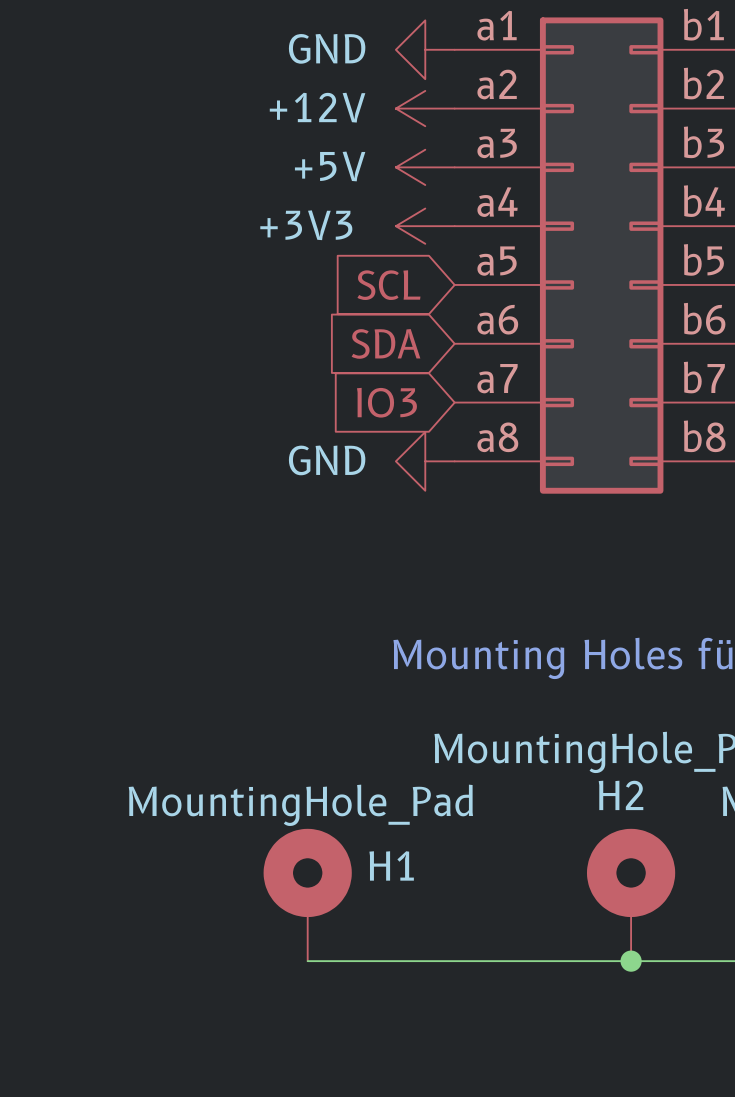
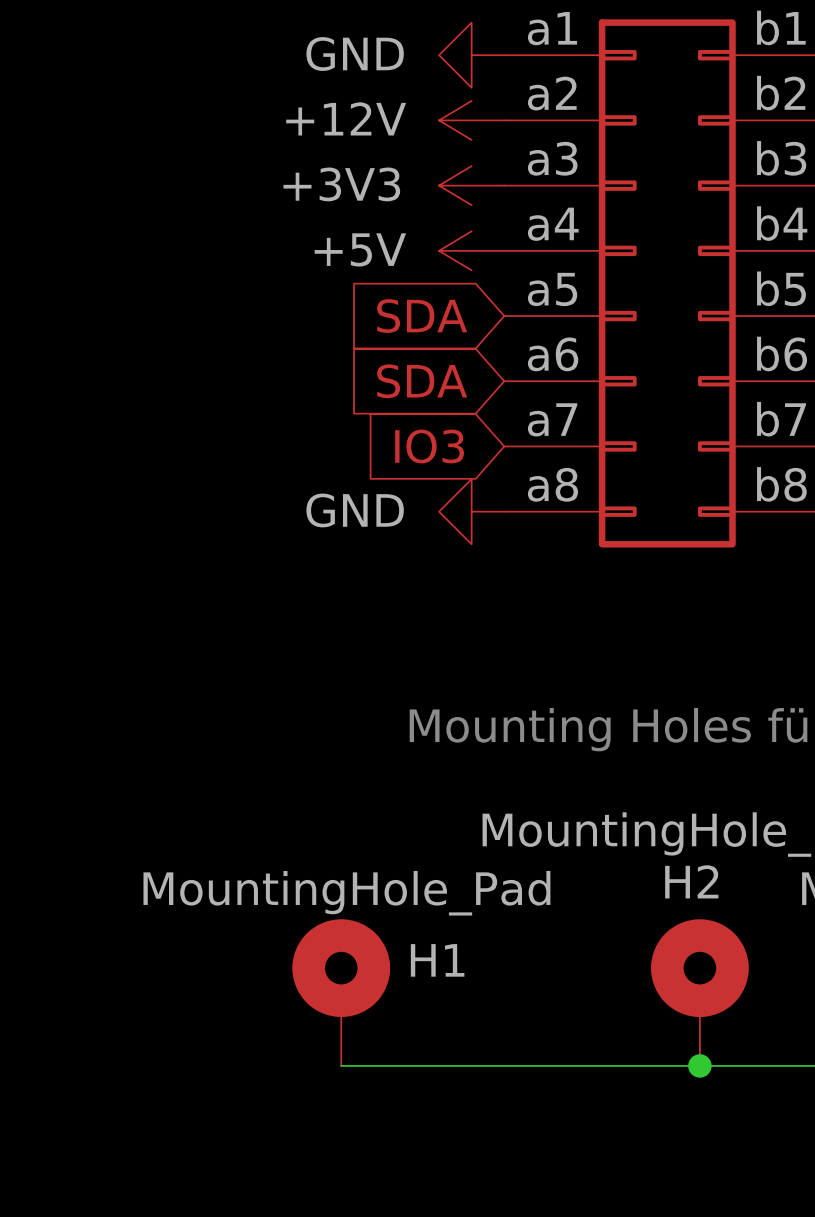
power symbol: +5V (425, 167) -> +3V3 (471, 185)
power symbol: +3V3 (425, 226) -> +5V (471, 250)
global label: SCL (388, 285) -> SDA (422, 316)

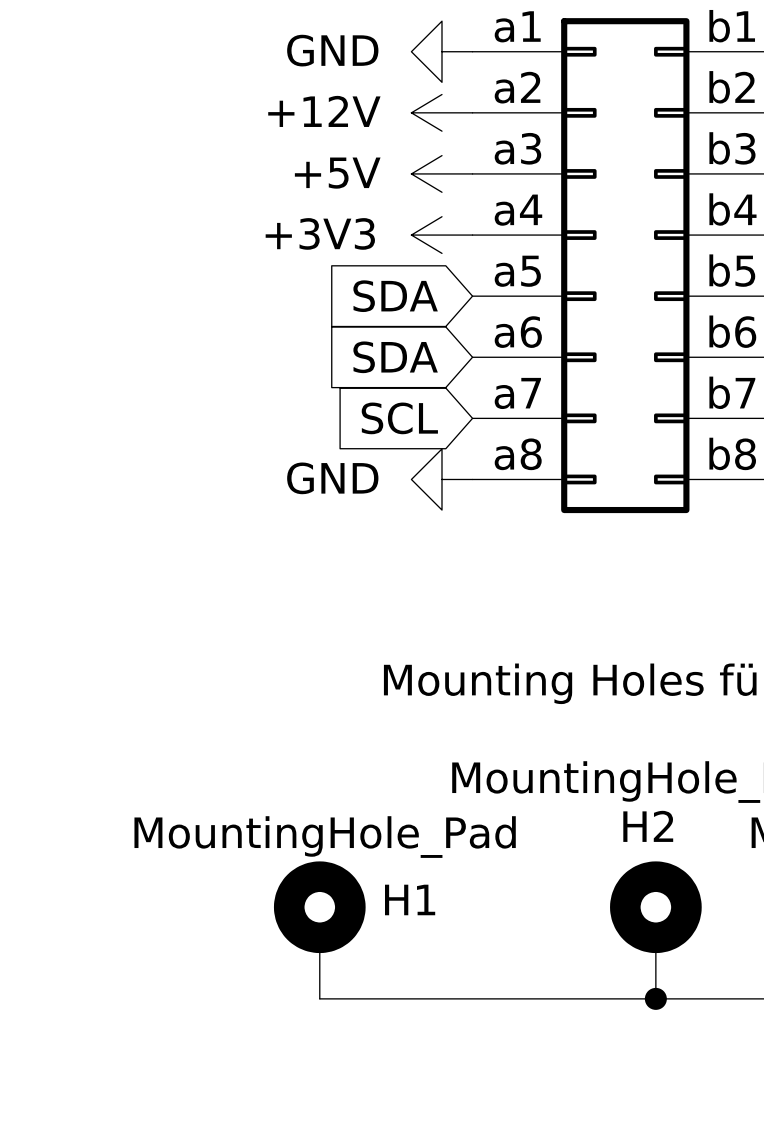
power symbol: +3V3 (471, 185) -> +5V (441, 173)
power symbol: +5V (471, 250) -> +3V3 (441, 235)
global label: IO3 (429, 446) -> SCL (399, 418)

